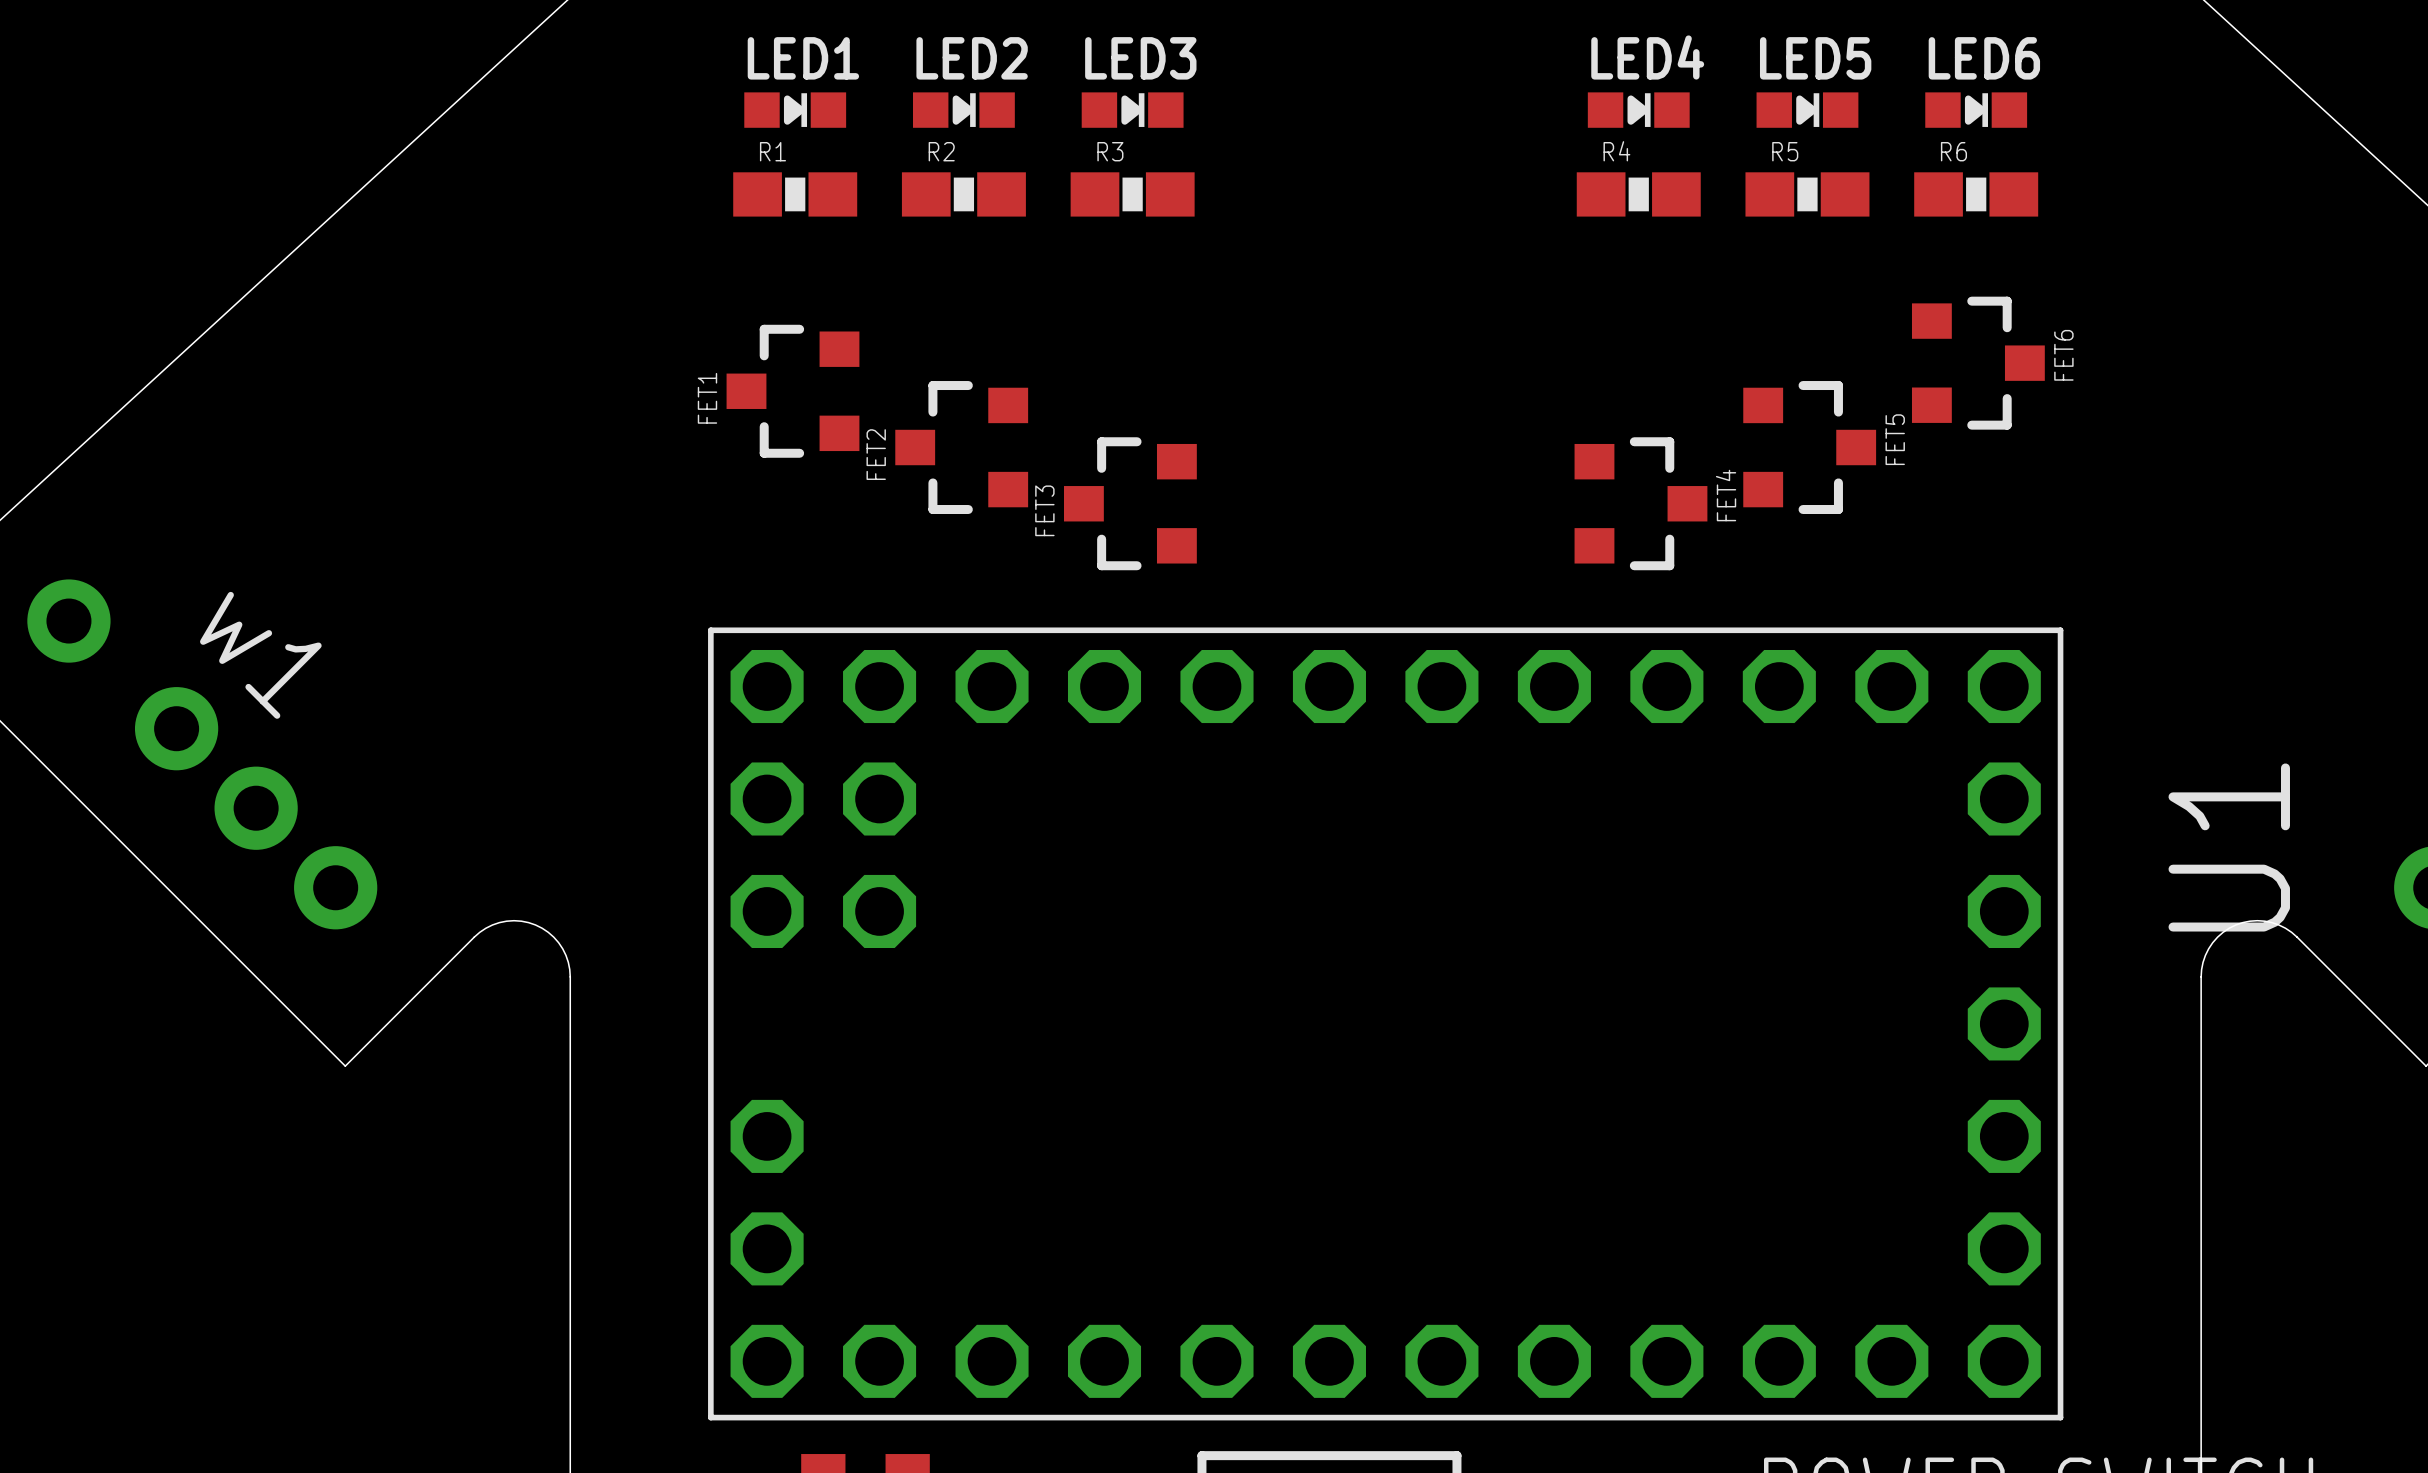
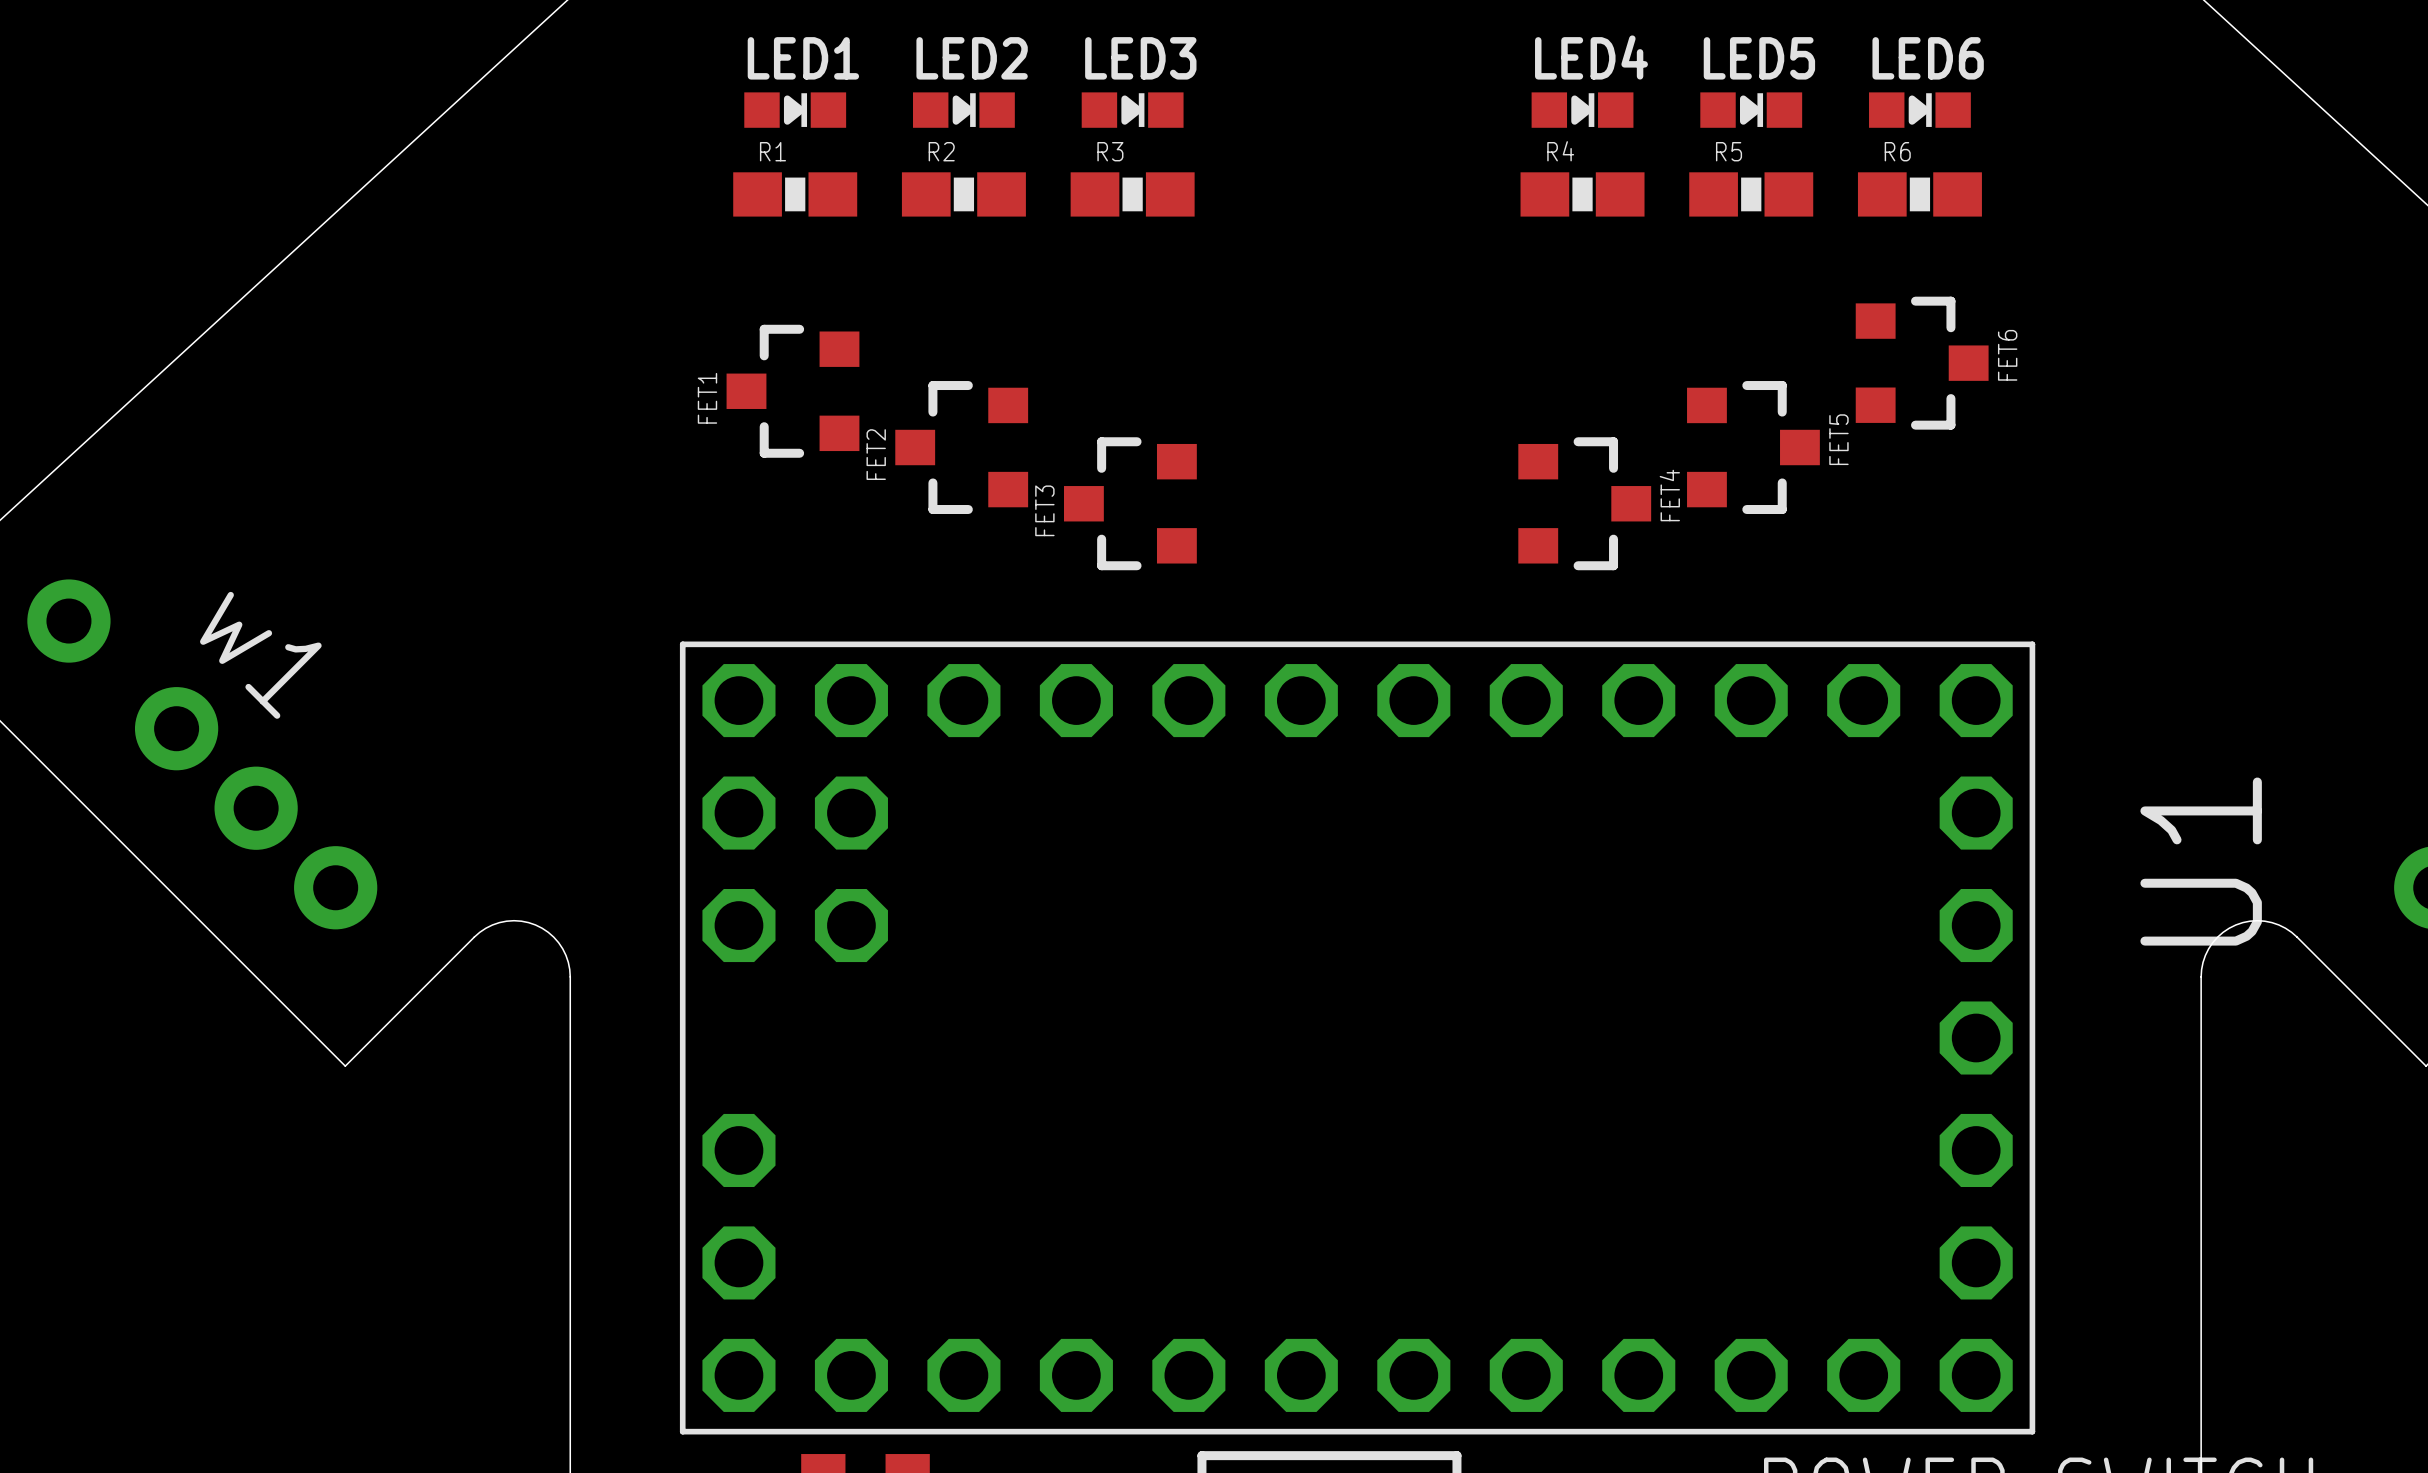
LED4 position: (1638, 110) -> (1582, 110)
LED5 position: (1807, 110) -> (1751, 110)
LED6 position: (1976, 110) -> (1919, 110)
R4 position: (1638, 194) -> (1582, 194)
R5 position: (1807, 194) -> (1751, 194)
R6 position: (1976, 194) -> (1919, 194)
FET6 position: (1978, 363) -> (1922, 363)
FET5 position: (1809, 447) -> (1753, 447)
FET4 position: (1640, 503) -> (1584, 503)
U1 position: (1385, 1023) -> (1357, 1038)

